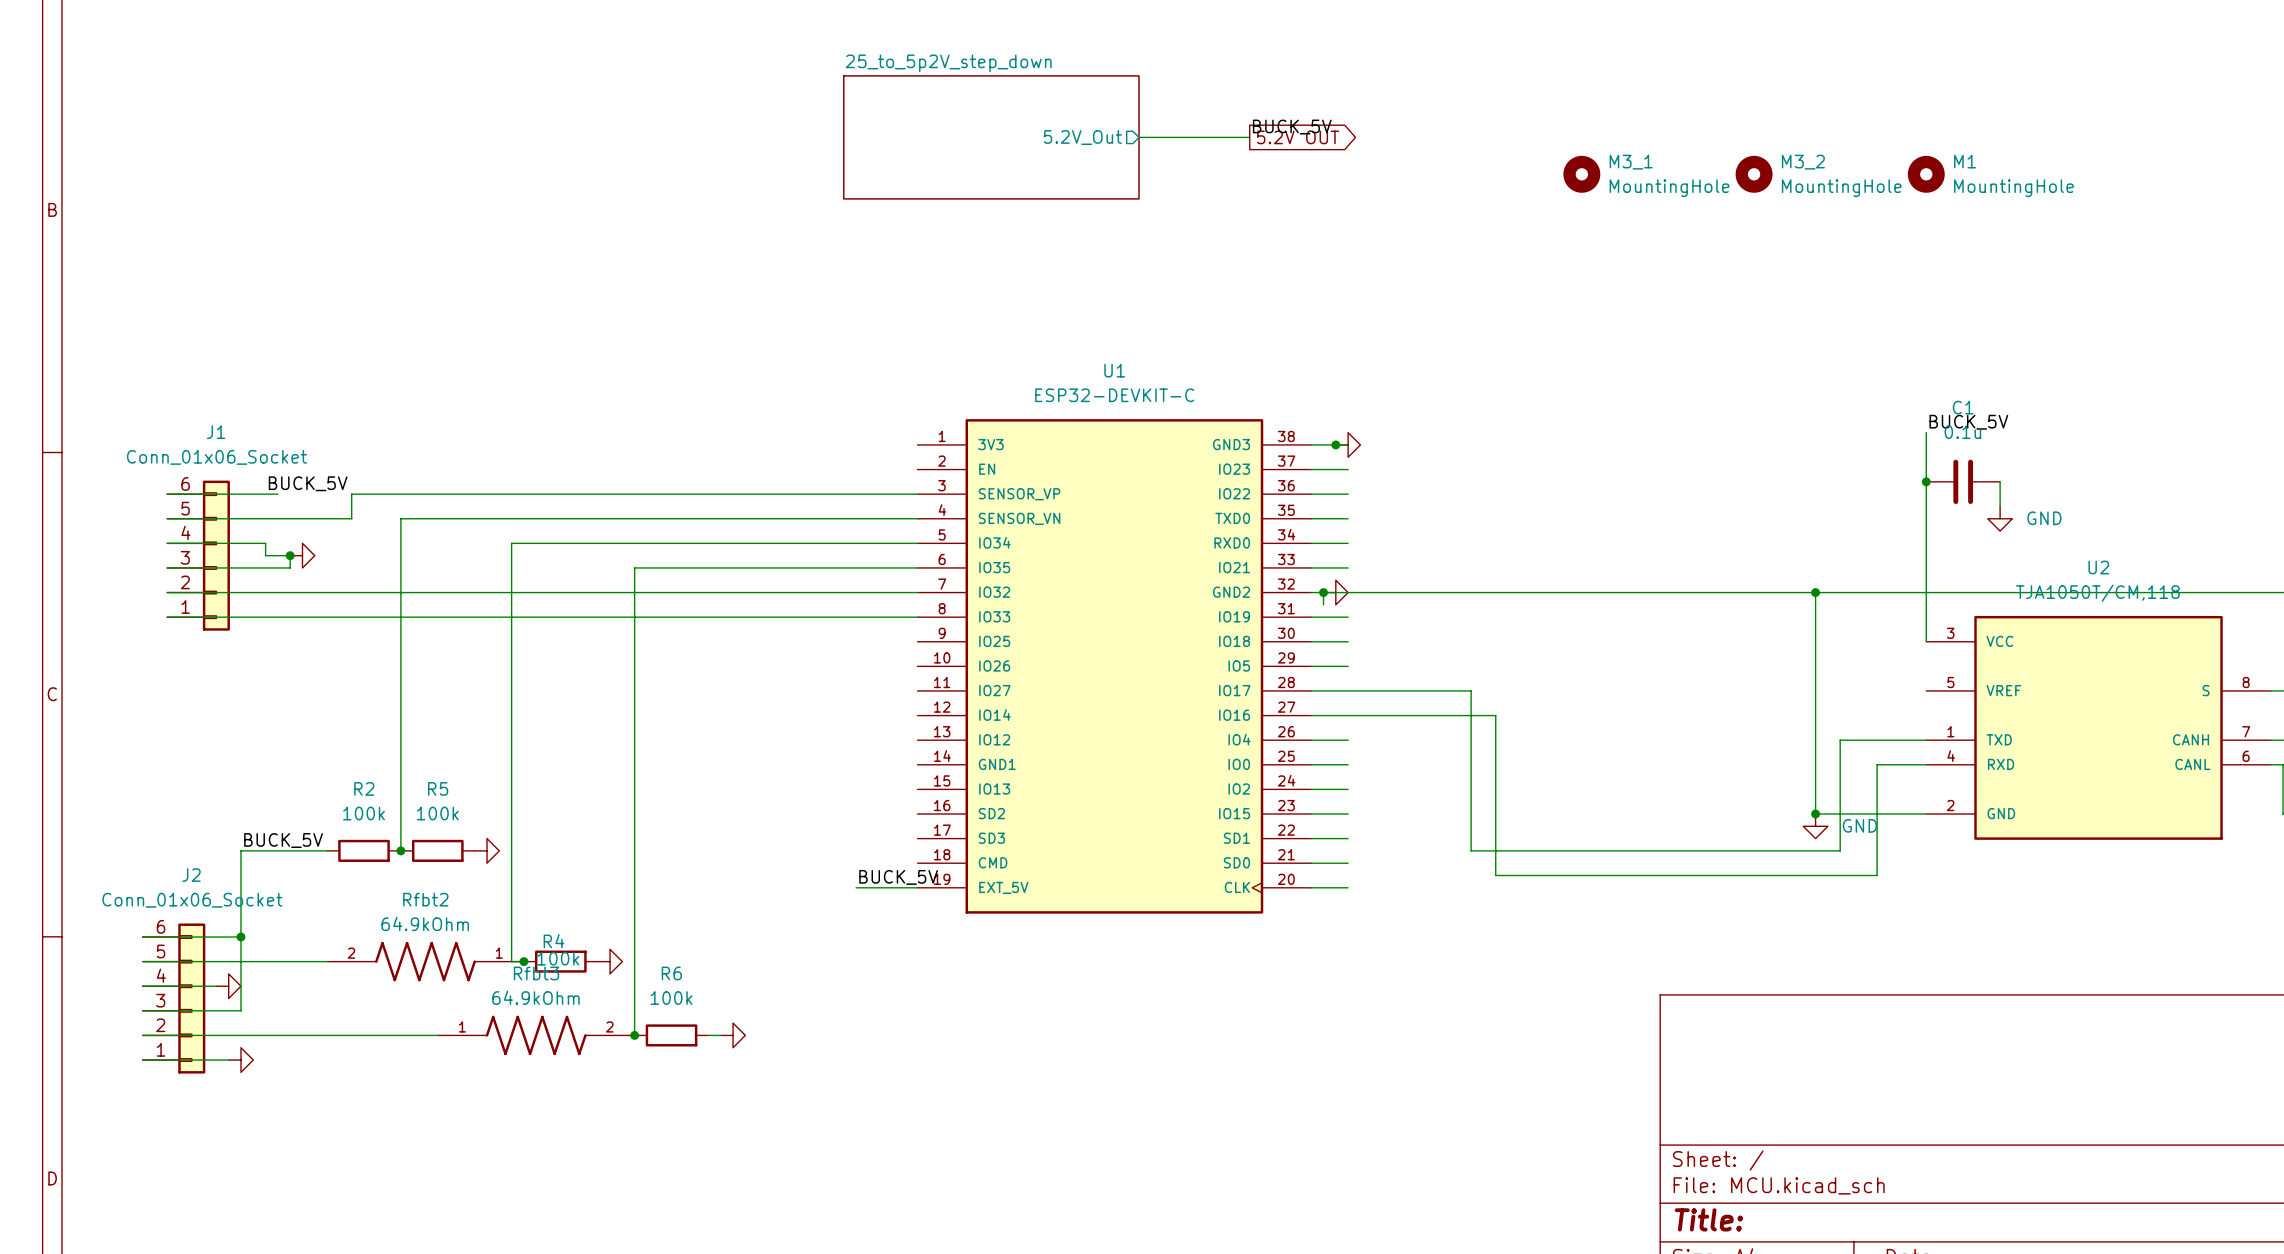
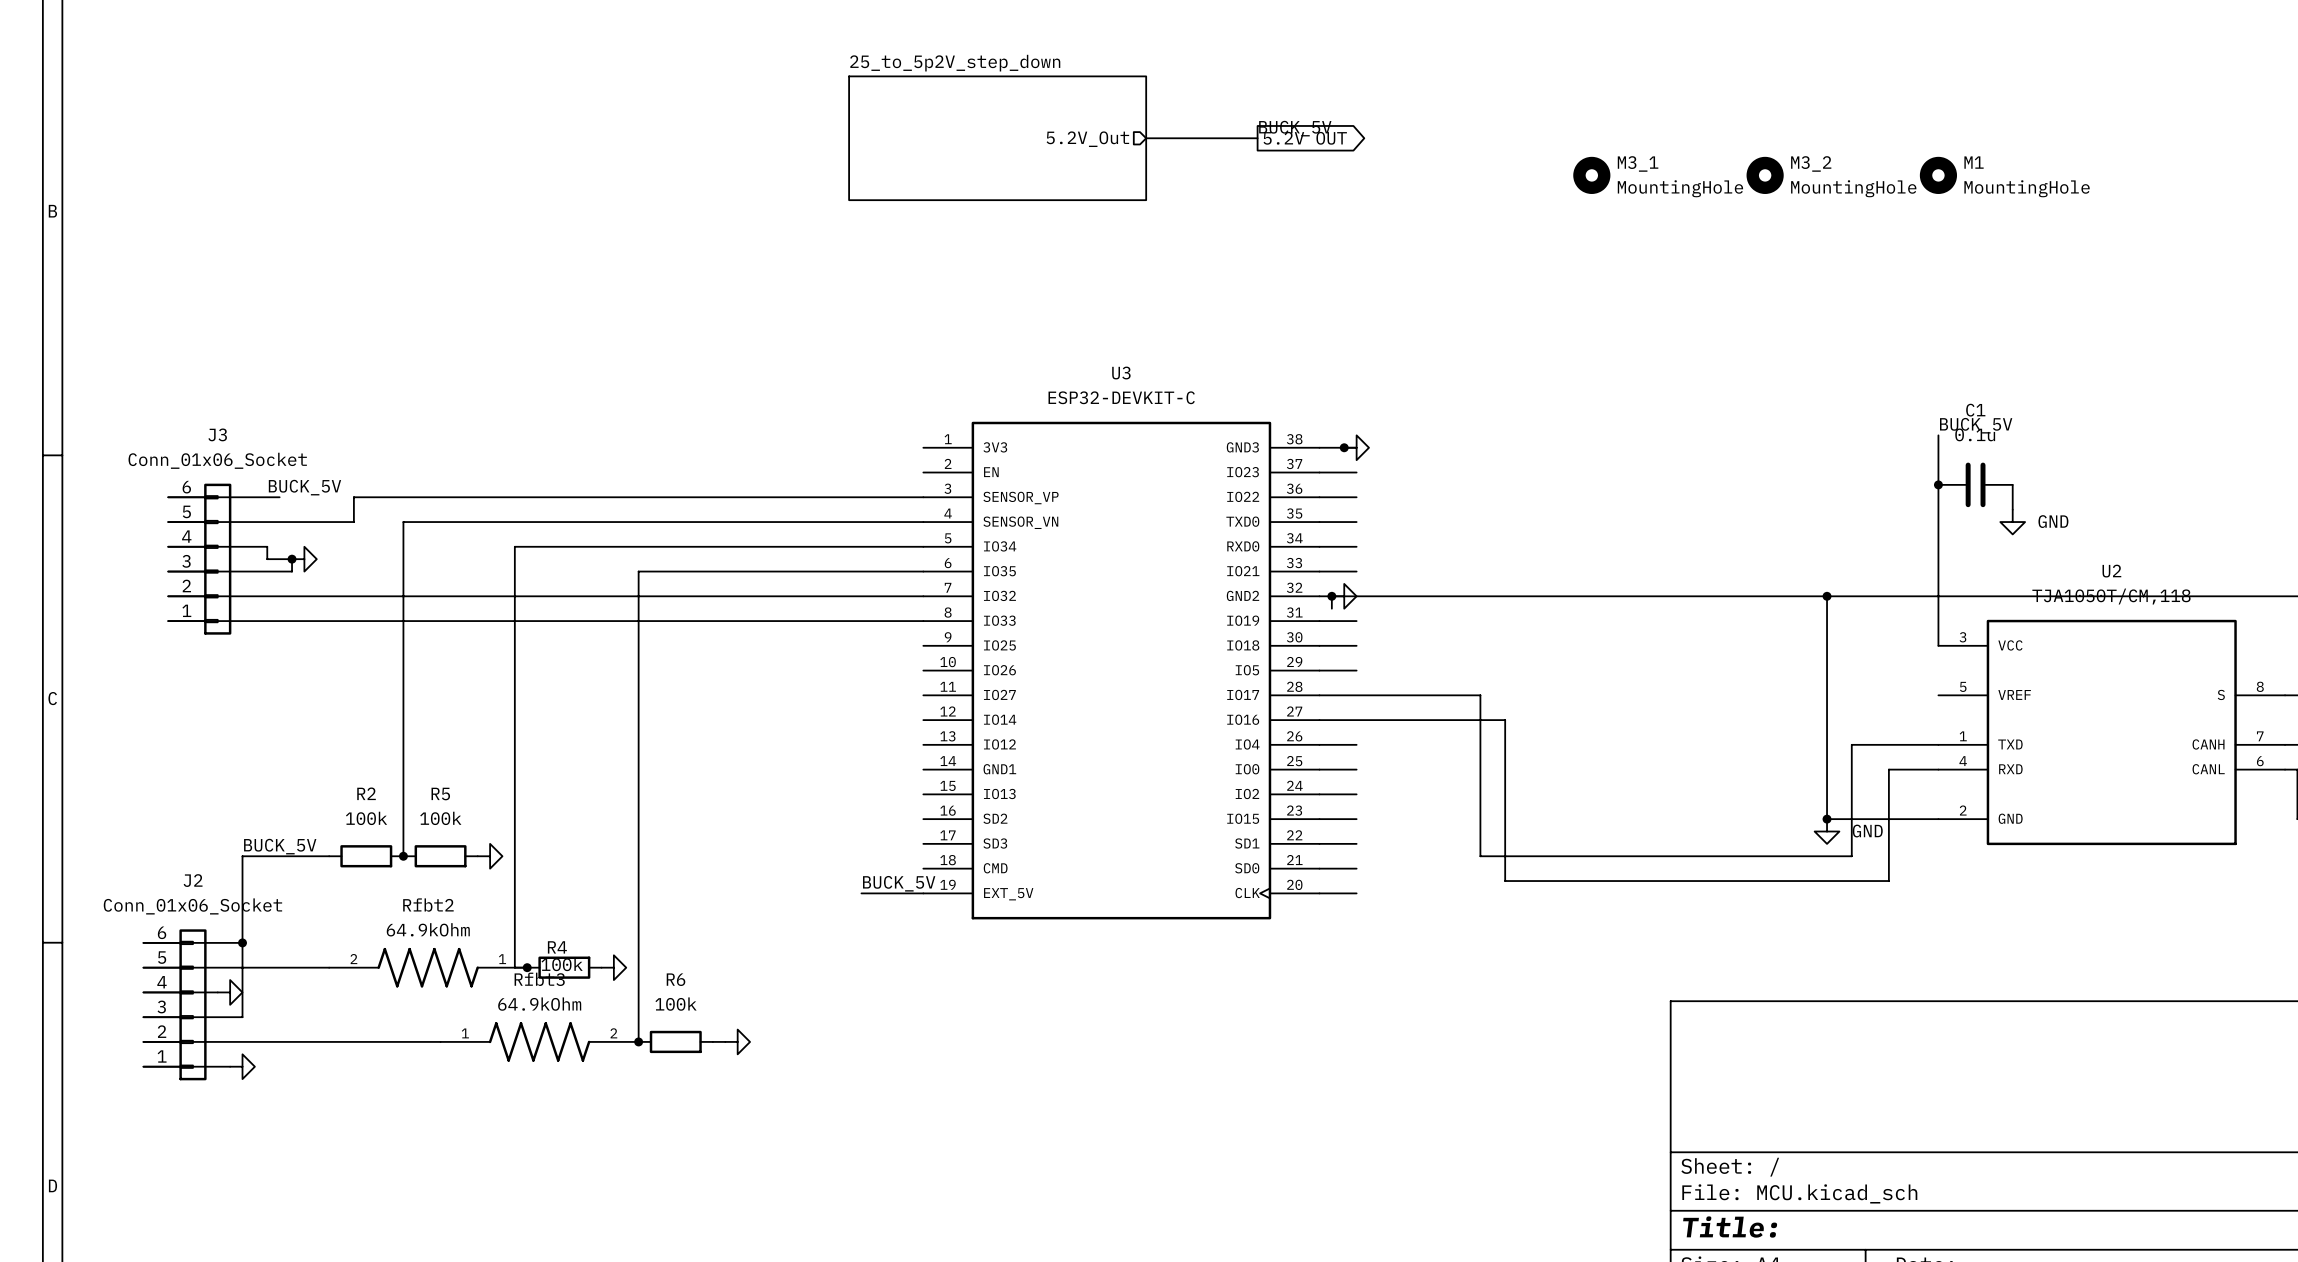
U1 name: U1 (1114, 370) -> U3 (1121, 373)
J1 name: J1 (216, 432) -> J3 (217, 434)

